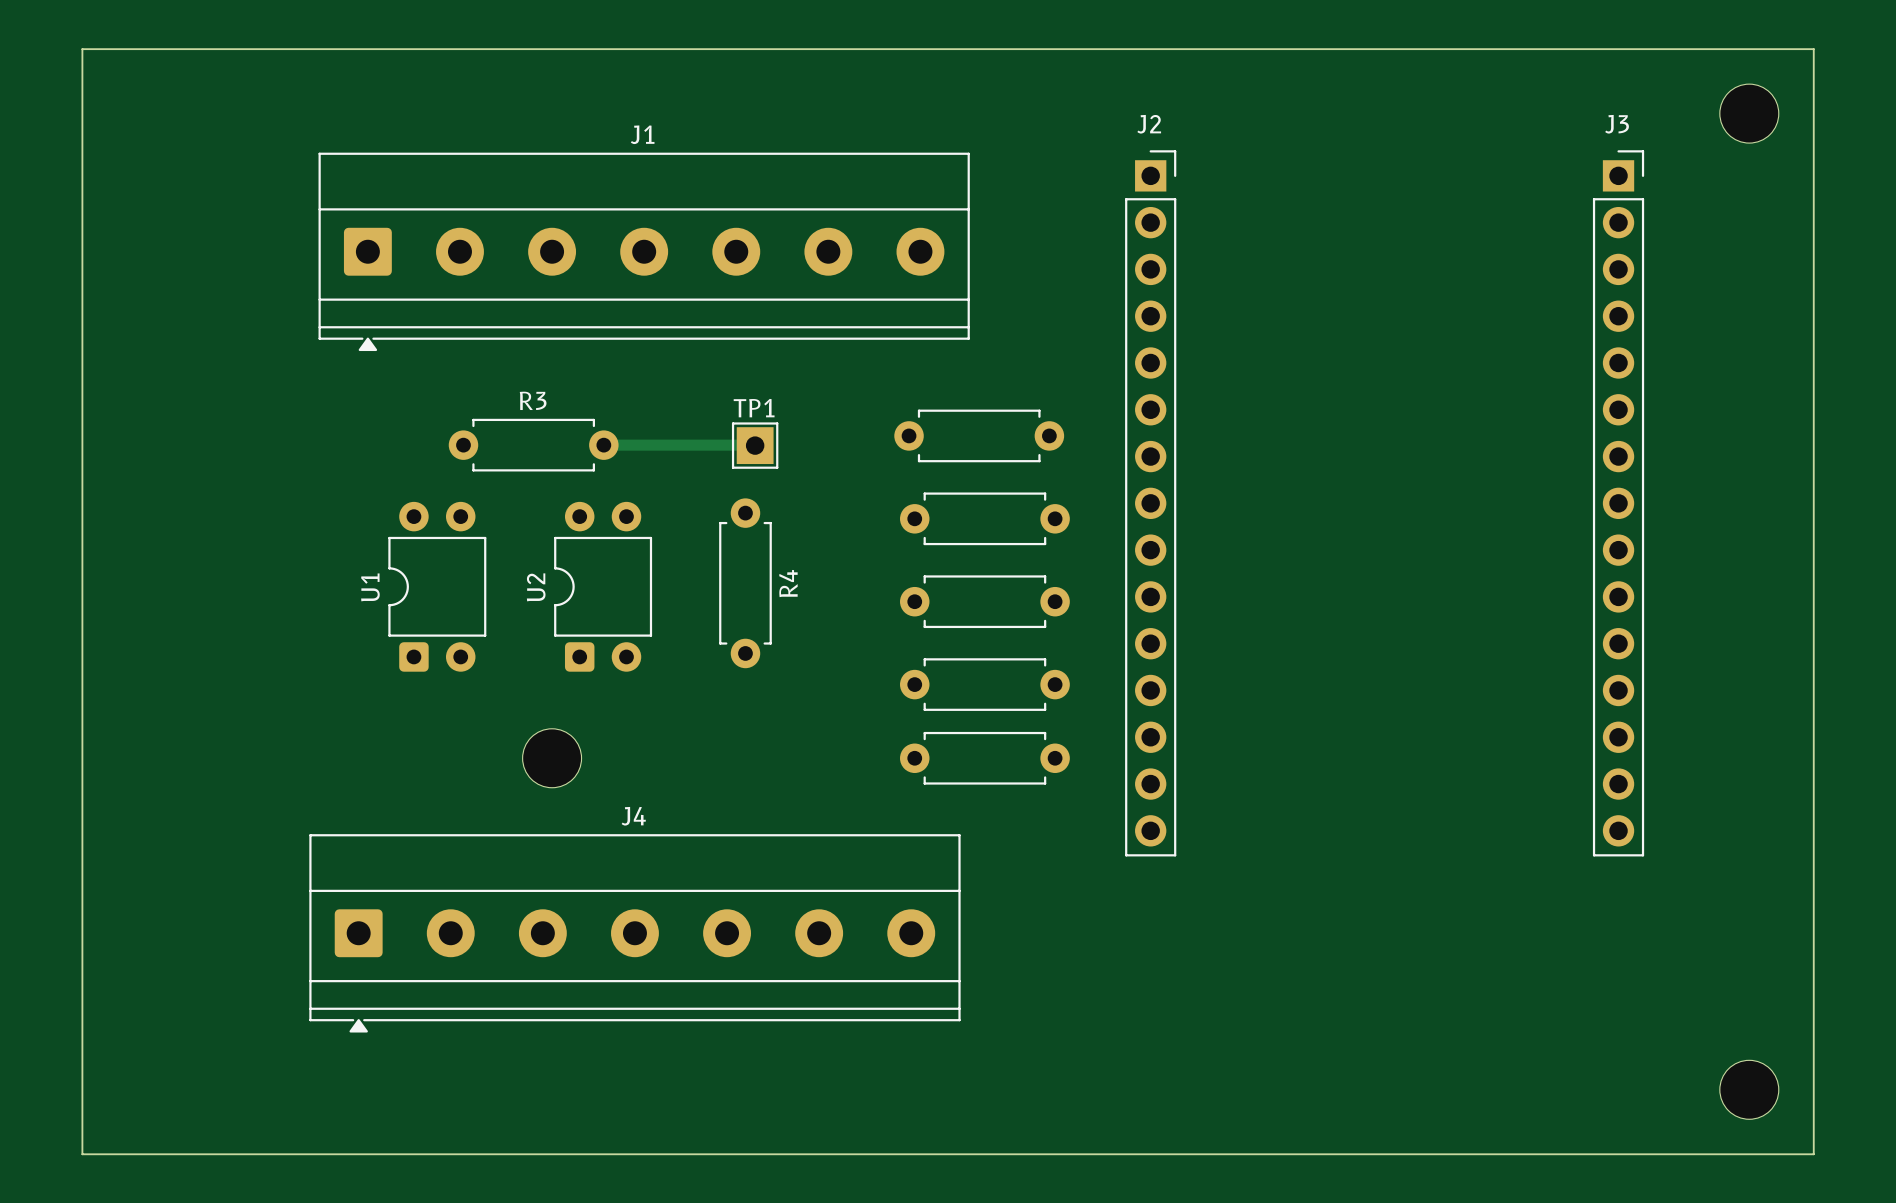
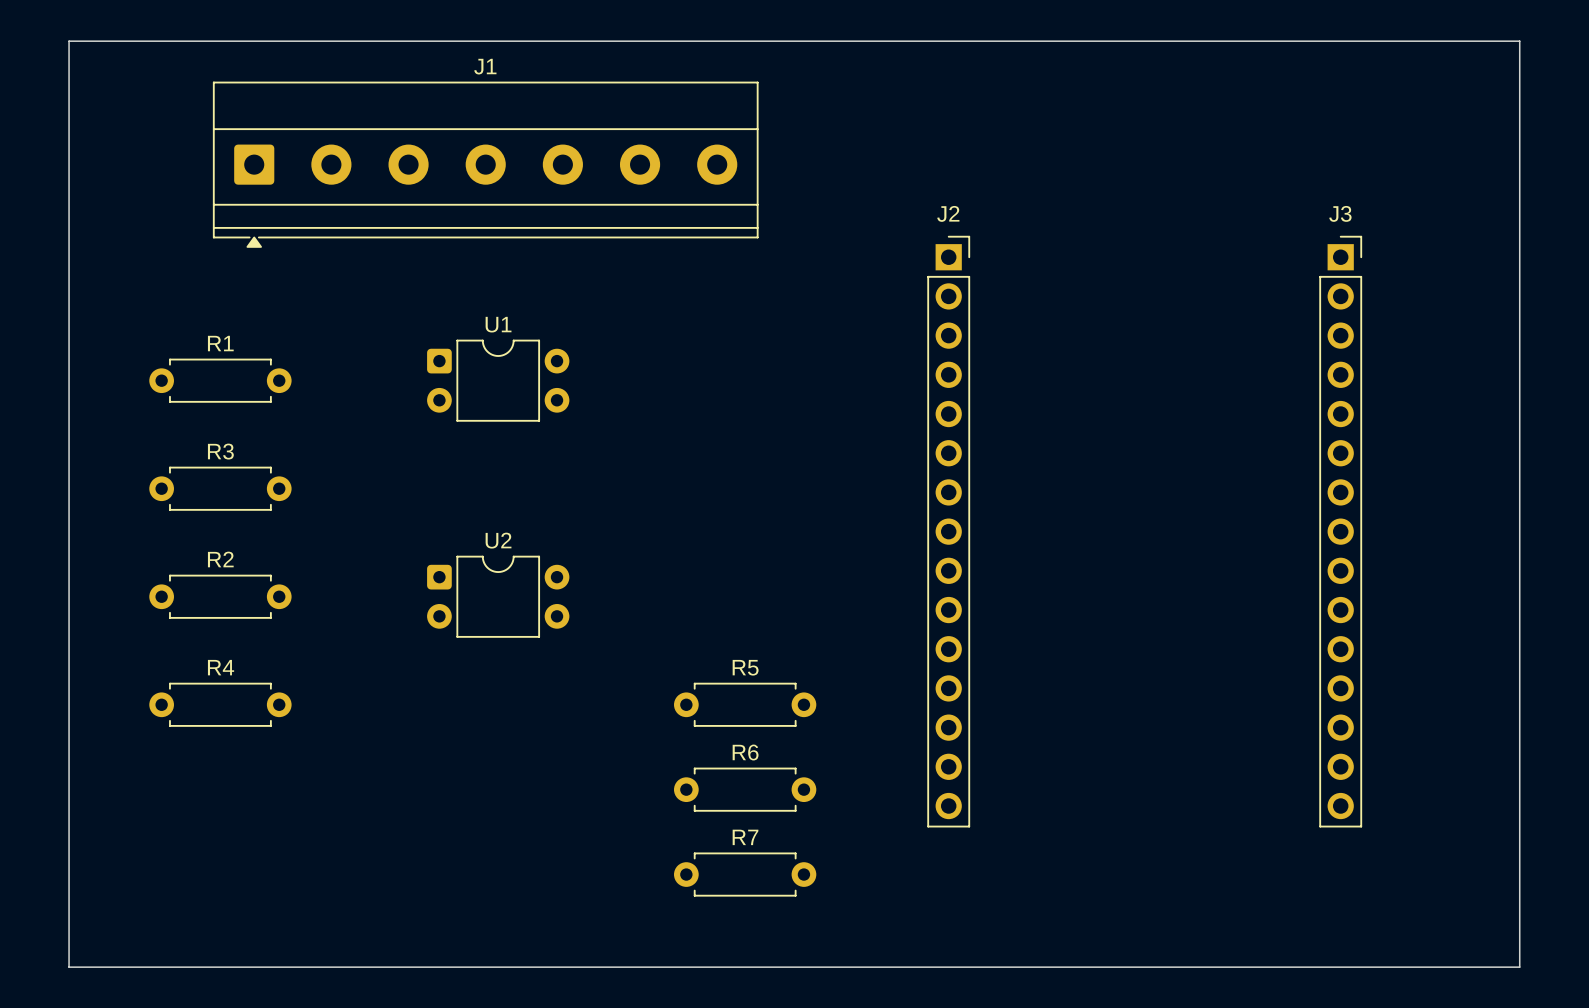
part: (1749, 113) -> none
J1 position: (644, 251) -> (485, 164)
part: (979, 435) -> none
R3 position: (533, 445) -> (220, 488)
track: (603, 445) (754, 445) -> none
TP1: (755, 445) -> none
R1: none -> (220, 380)
J2 position: (1150, 503) -> (948, 531)
J3 position: (1618, 503) -> (1340, 531)
part: (984, 518) -> none
R4 rotation: 0° (745, 583) -> 90° clockwise (220, 704)
R4 position: (745, 583) -> (220, 704)
R4 name position: R4 (788, 583) -> R4 (221, 667)
U1 rotation: 0° (437, 586) -> 90° clockwise (498, 380)
U1 position: (437, 586) -> (498, 380)
U2 rotation: 0° (603, 586) -> 90° clockwise (498, 596)
U2 position: (603, 586) -> (498, 596)
part: (984, 601) -> none
part: (984, 684) -> none
R2: none -> (220, 596)
part: (552, 758) -> none
part: (984, 758) -> none
R5: none -> (745, 704)
J4: (634, 933) -> none
R6: none -> (745, 789)
R7: none -> (745, 874)
part: (1749, 1089) -> none

